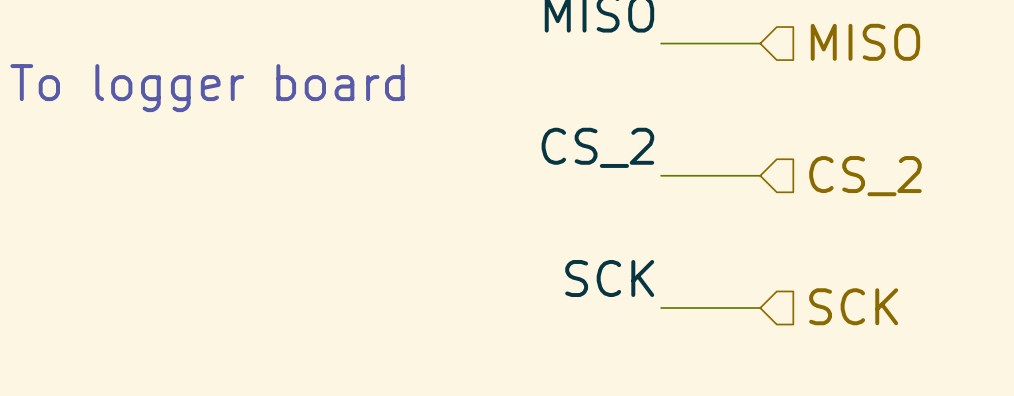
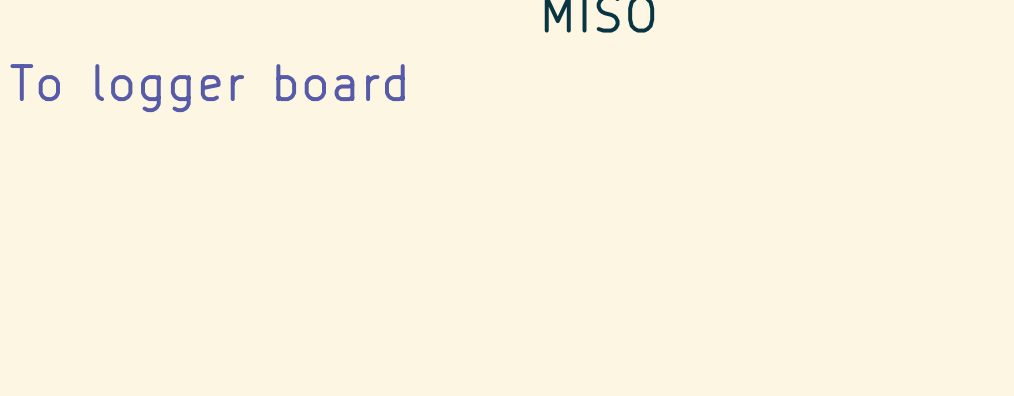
hierarchical label: MISO (865, 42) -> none
wire: (661, 43) (760, 43) -> none
label: CS_2 (597, 147) -> none
wire: (661, 175) (760, 175) -> none
hierarchical label: CS_2 (865, 176) -> none
label: SCK (609, 278) -> none
hierarchical label: SCK (853, 306) -> none
wire: (661, 307) (760, 307) -> none

